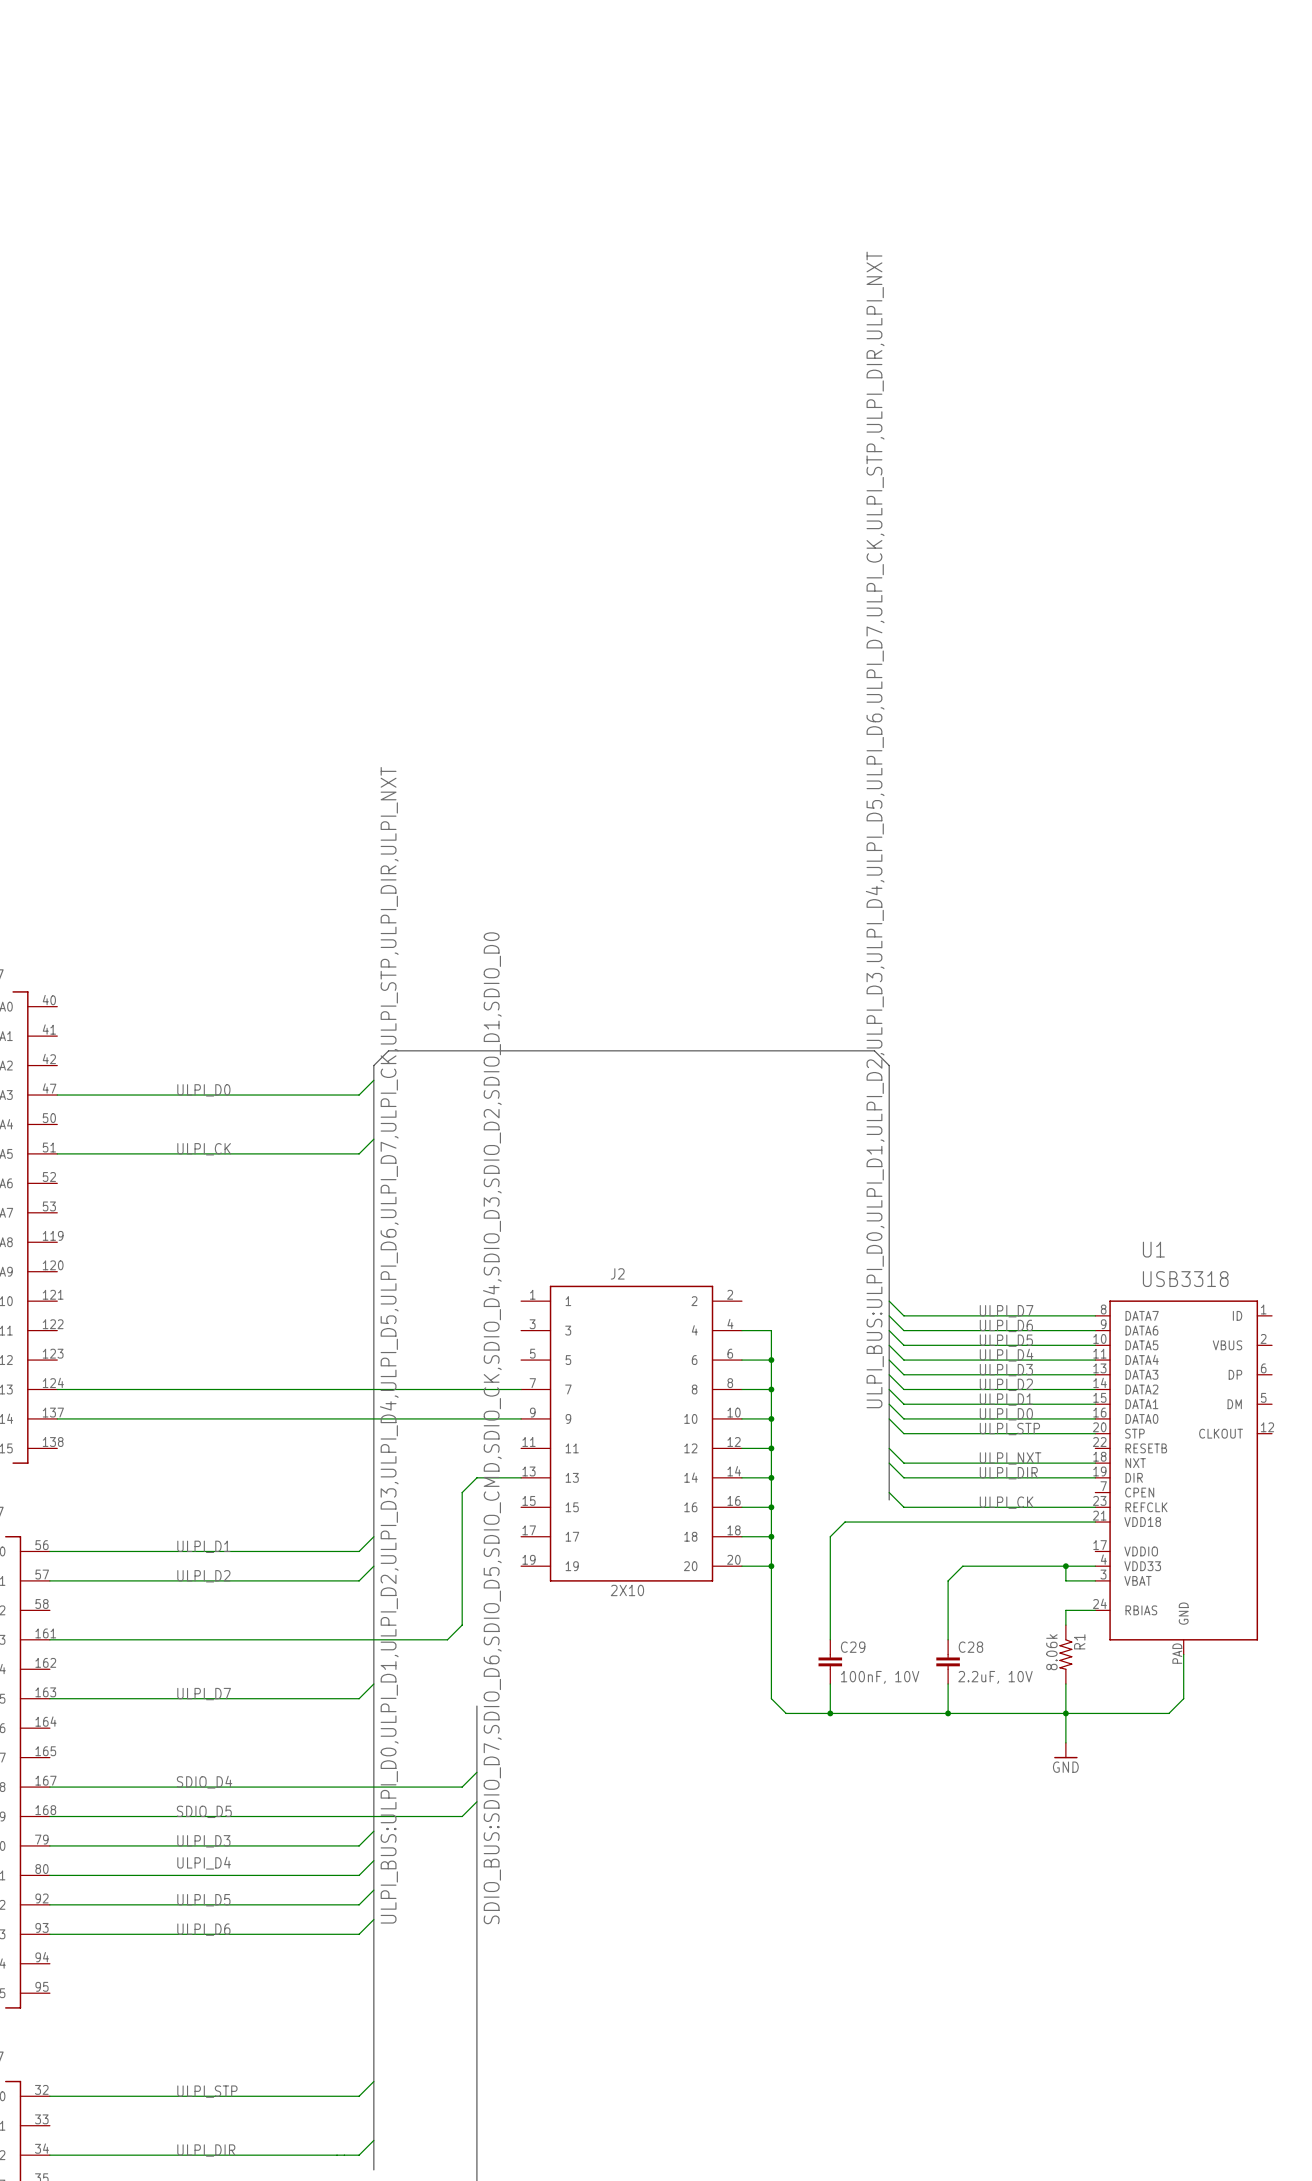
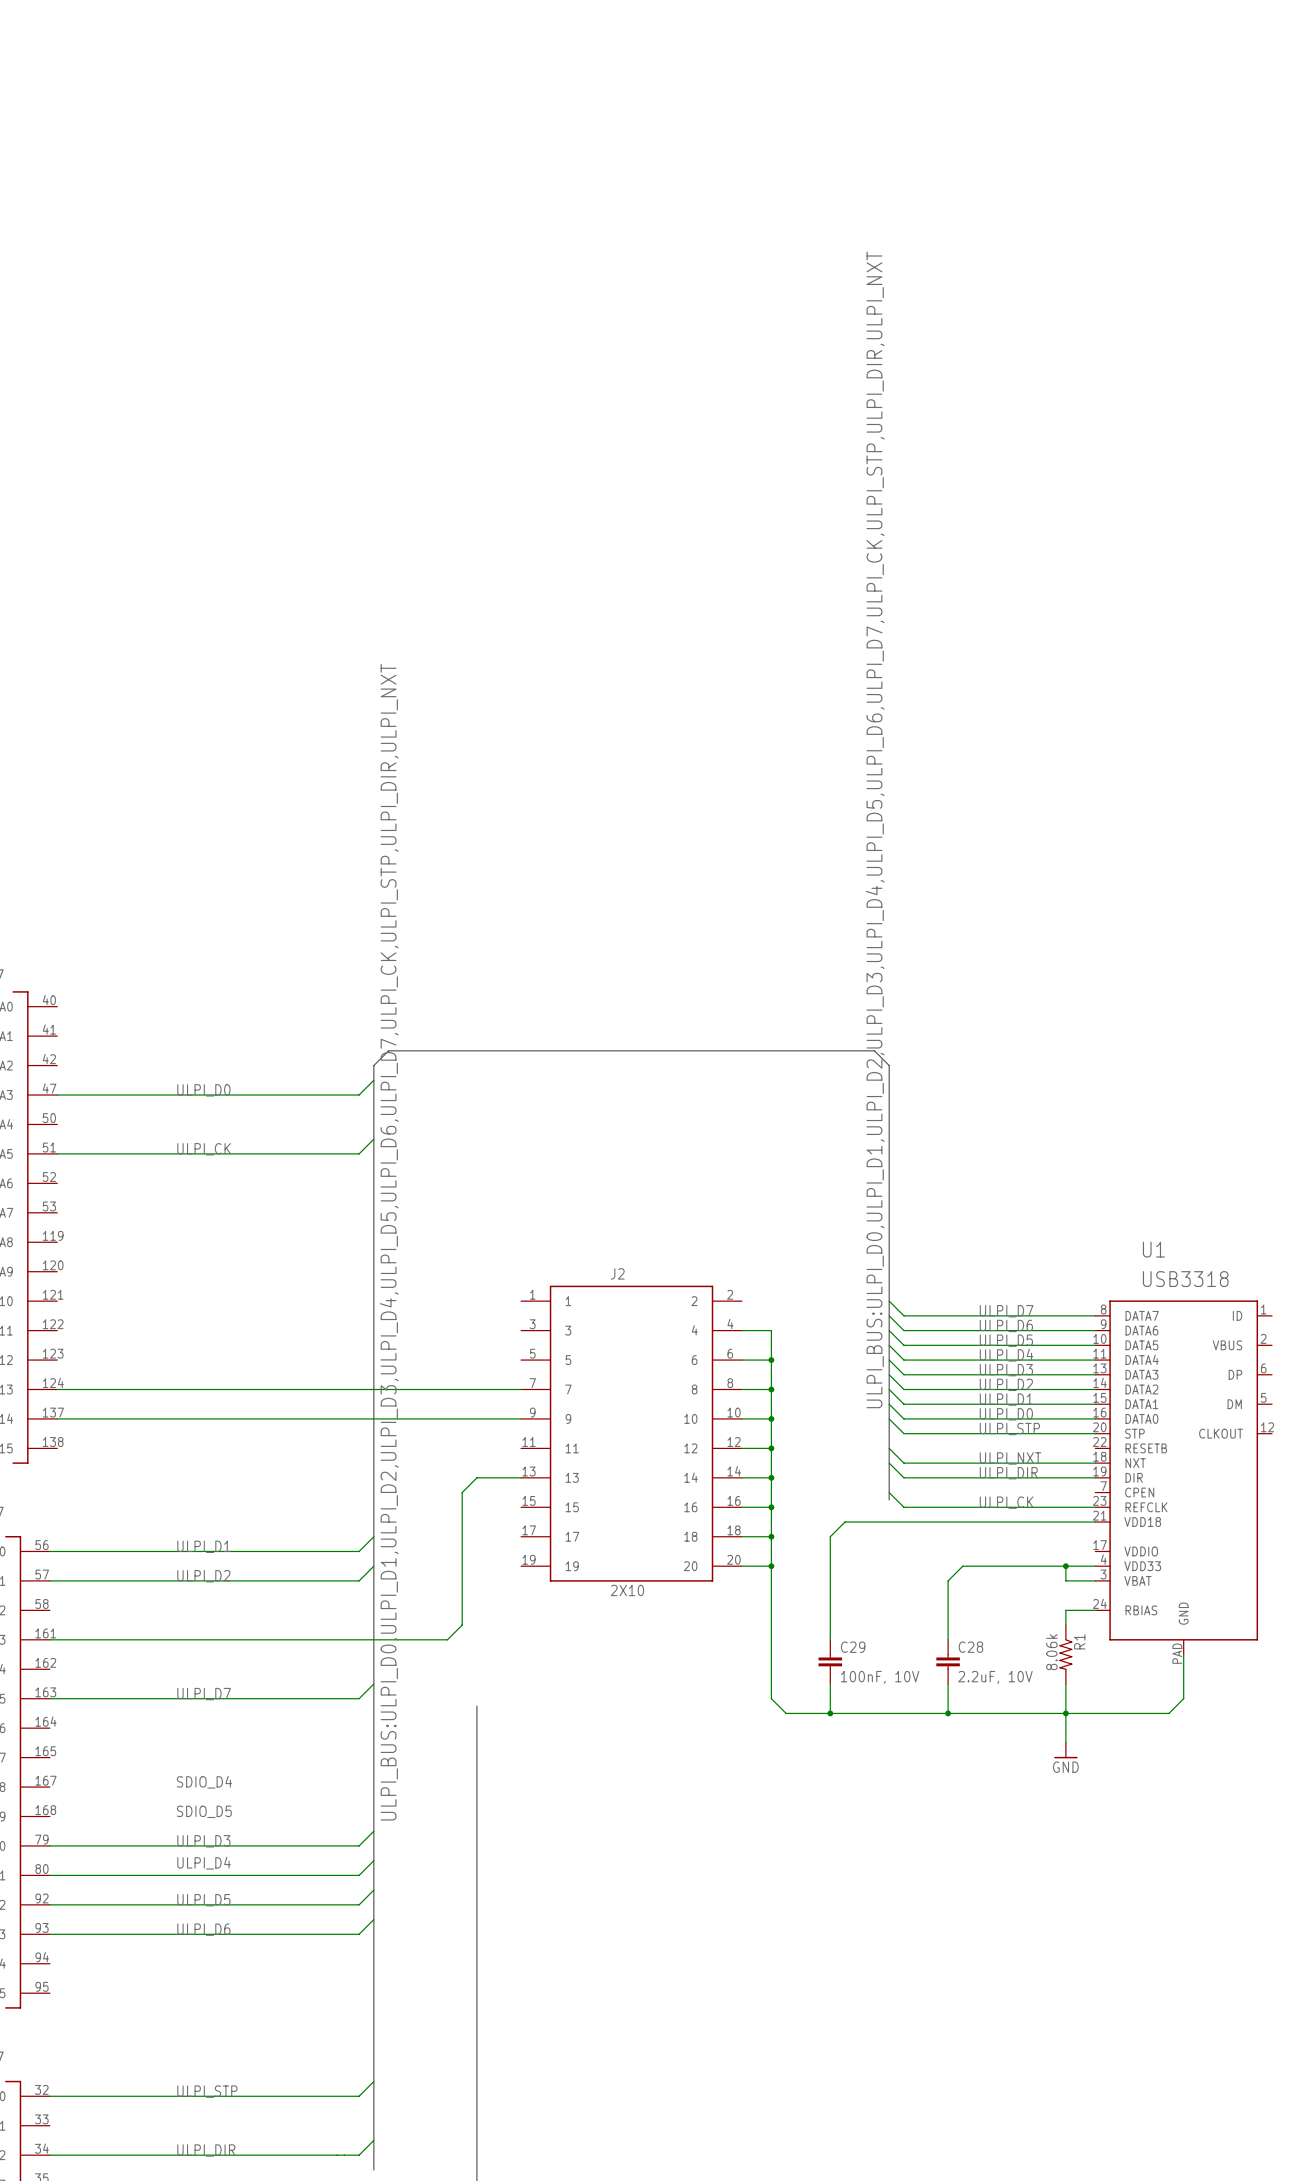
label position: ULPI_BUS:ULPI_D0,ULPI_D1,ULPI_D2,ULPI_D3,ULPI_D4,ULPI_D5,ULPI_D6,ULPI_D7,ULPI_CK,ULPI_STP,ULPI_DIR,ULPI_NXT (389, 1345) -> ULPI_BUS:ULPI_D0,ULPI_D1,ULPI_D2,ULPI_D3,ULPI_D4,ULPI_D5,ULPI_D6,ULPI_D7,ULPI_CK,ULPI_STP,ULPI_DIR,ULPI_NXT (389, 1242)
label: SDIO_BUS:SDIO_D7,SDIO_D6,SDIO_D5,SDIO_CMD,SDIO_CK,SDIO_D4,SDIO_D3,SDIO_D2,SDIO_D1,SDIO_D0 (492, 1428) -> none
wire: (476, 1772) (462, 1787) (49, 1787) -> none
wire: (476, 1801) (462, 1816) (49, 1816) -> none

